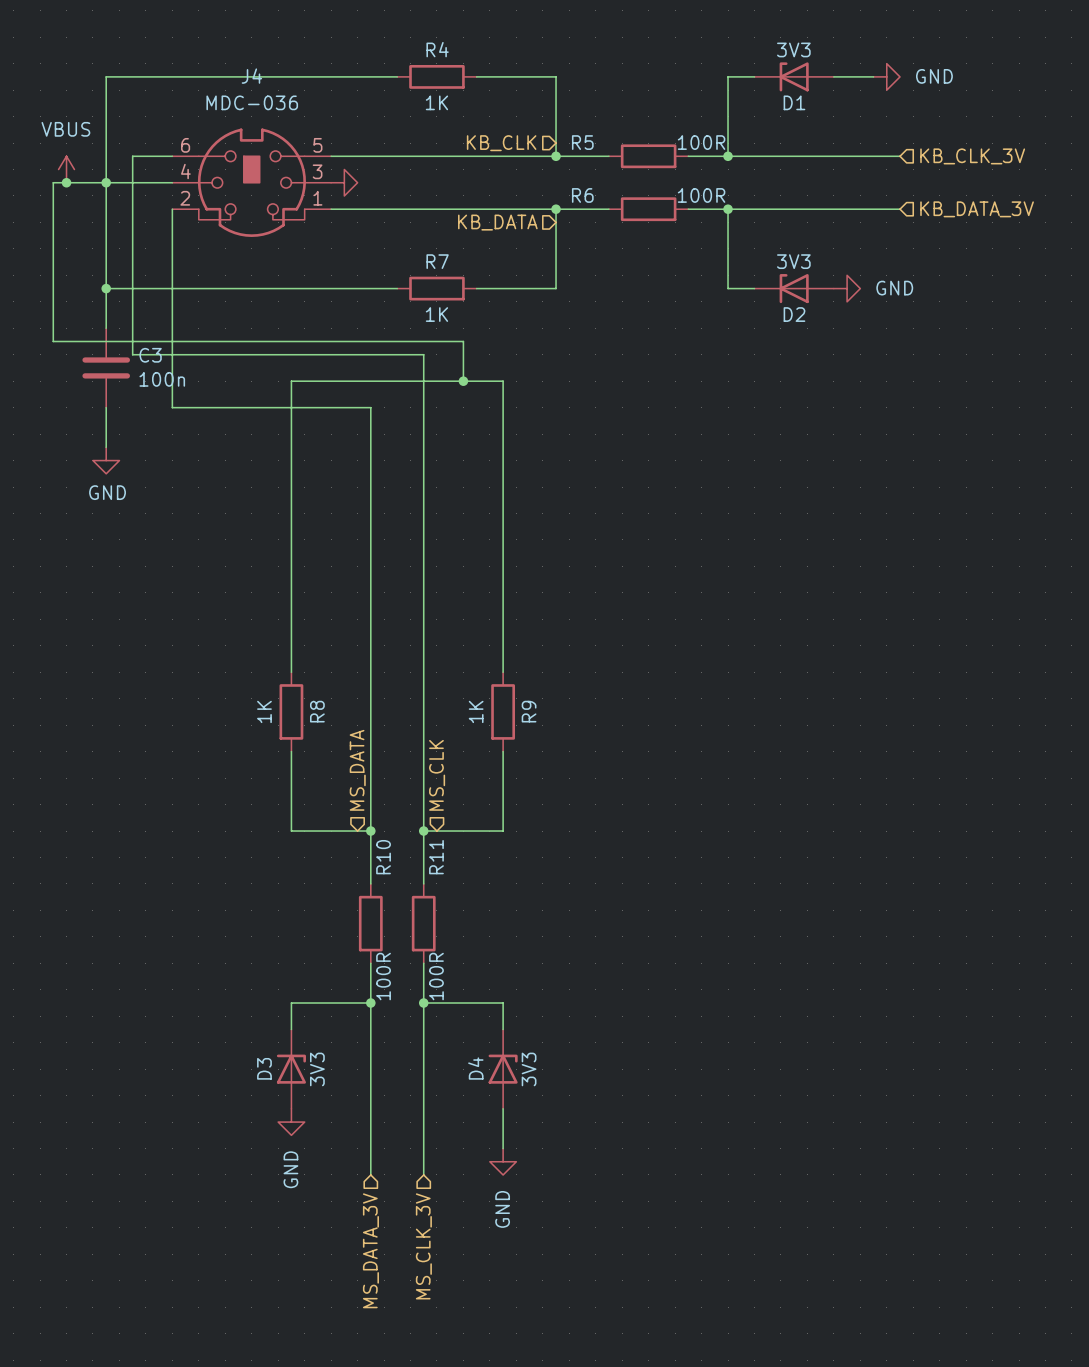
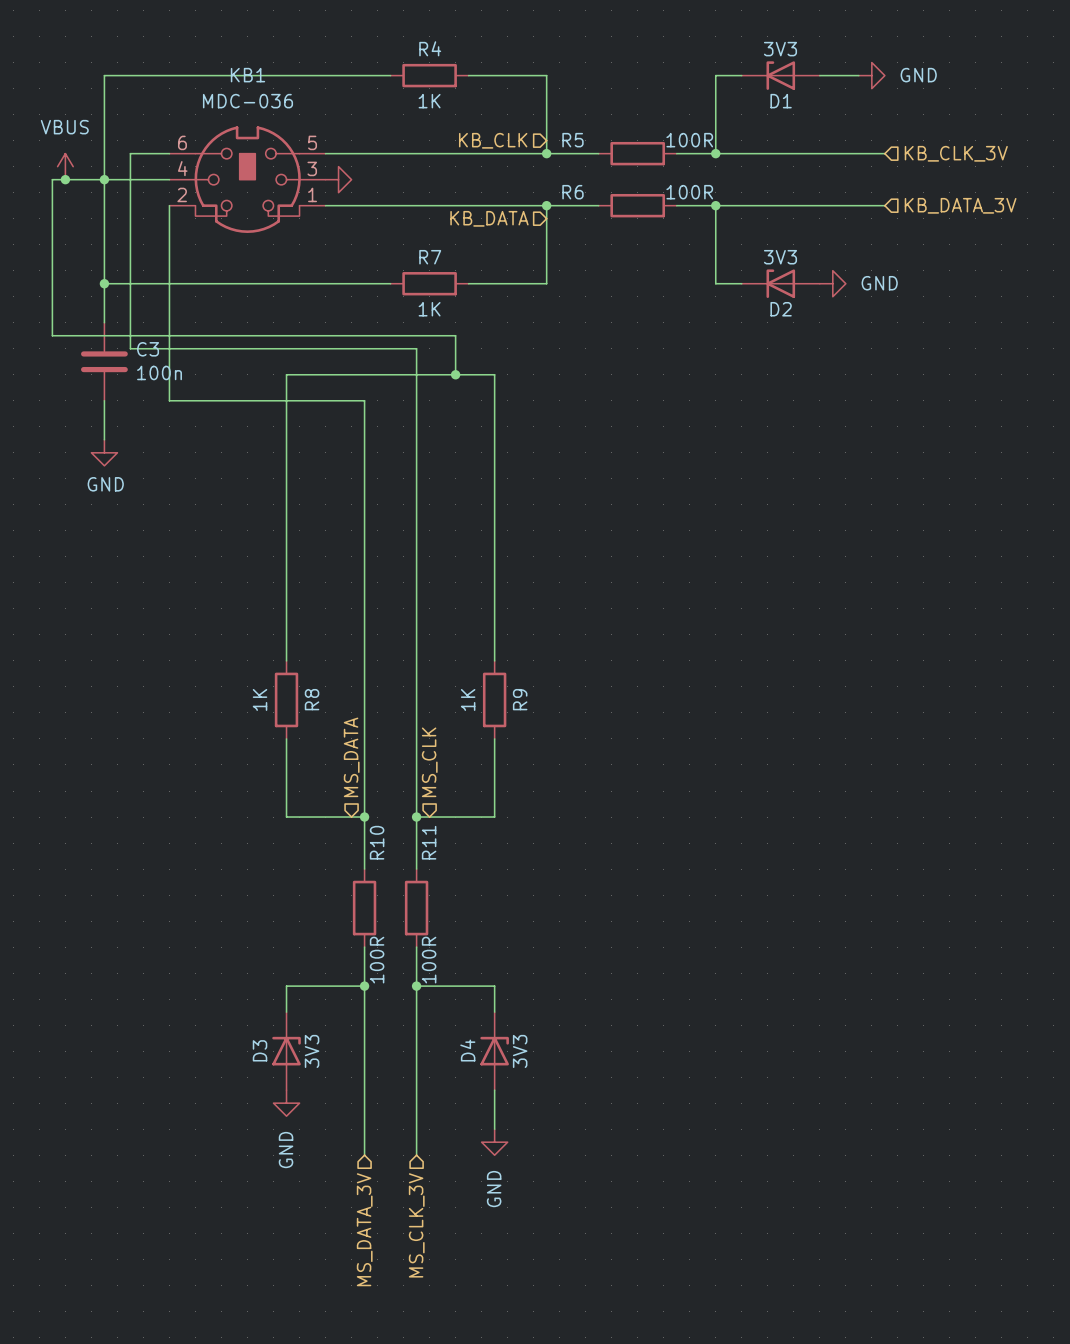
J4 name: J4 (251, 76) -> KB1 (247, 75)

